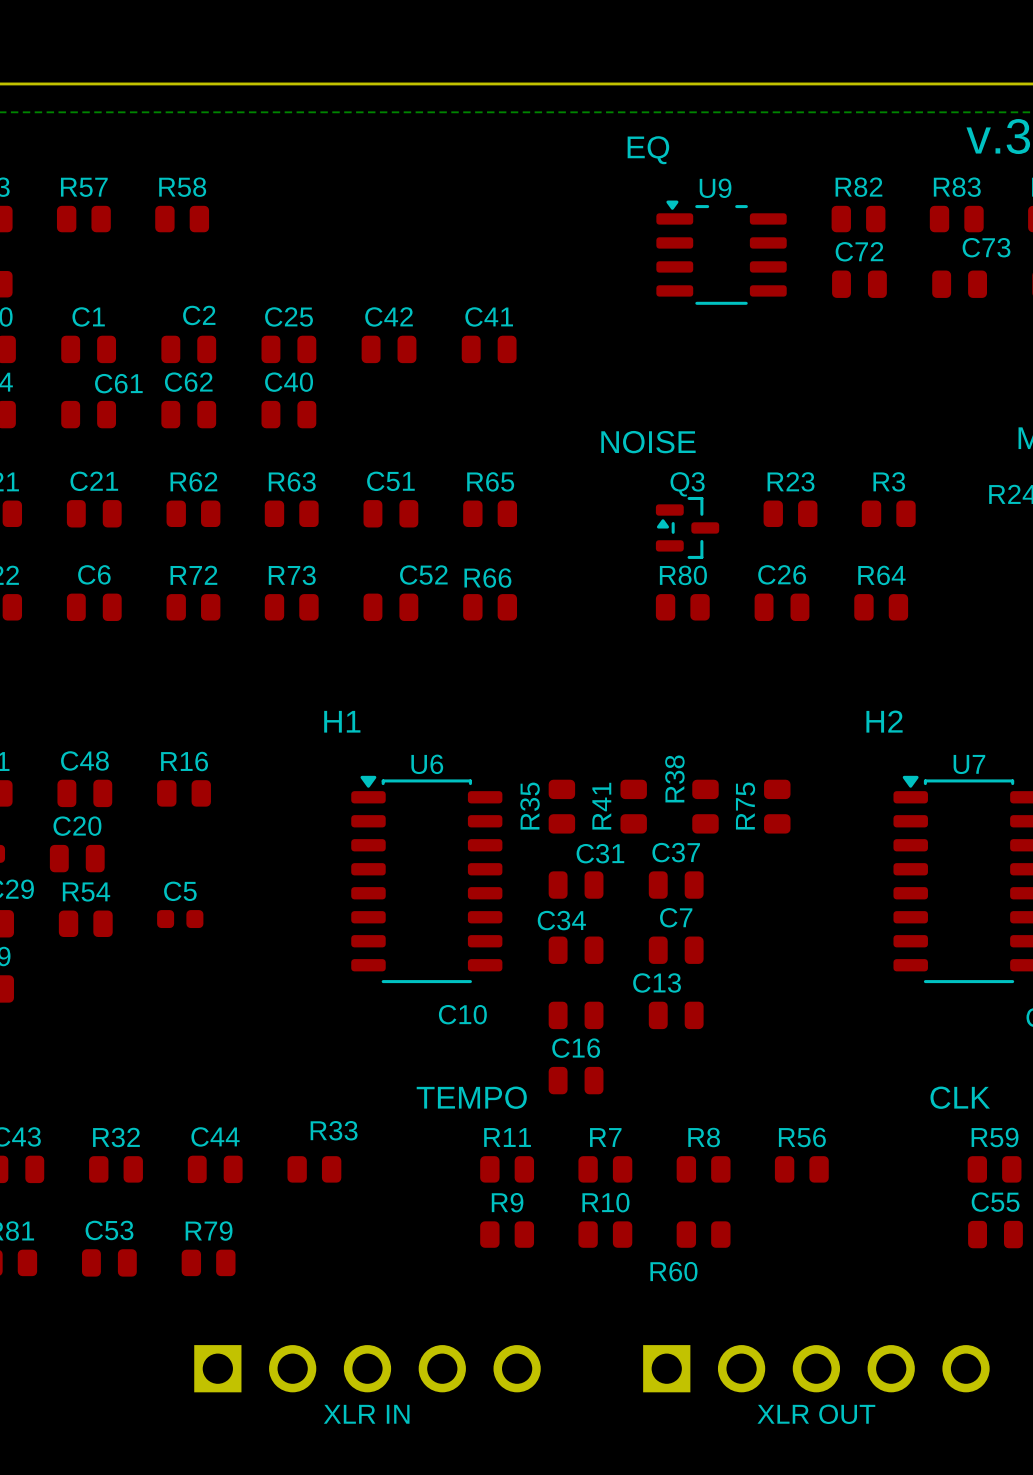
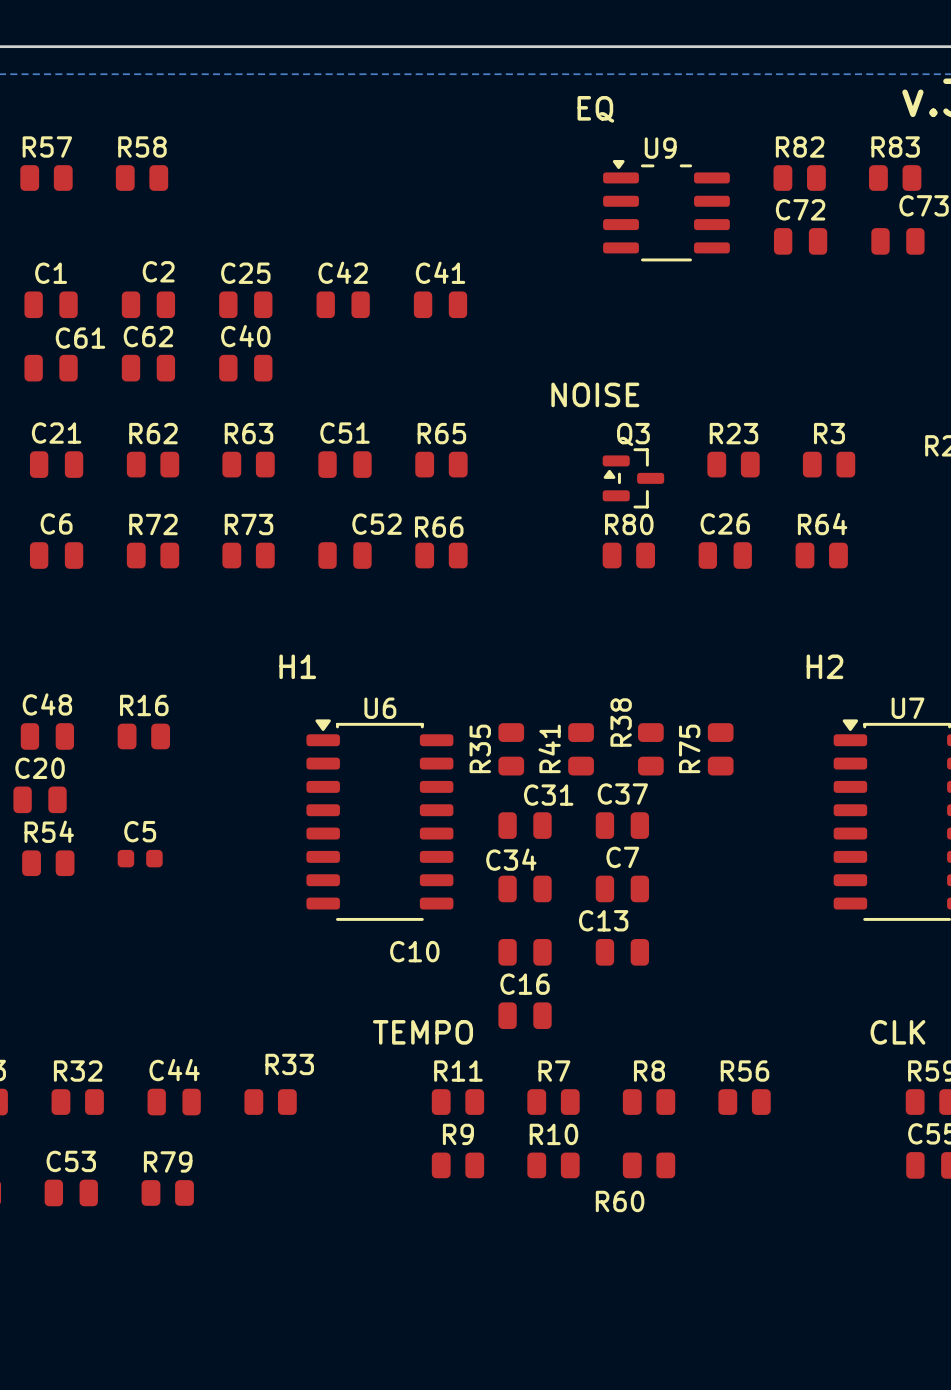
part: XLR IN (367, 1368) -> none
part: XLR OUT (816, 1368) -> none

